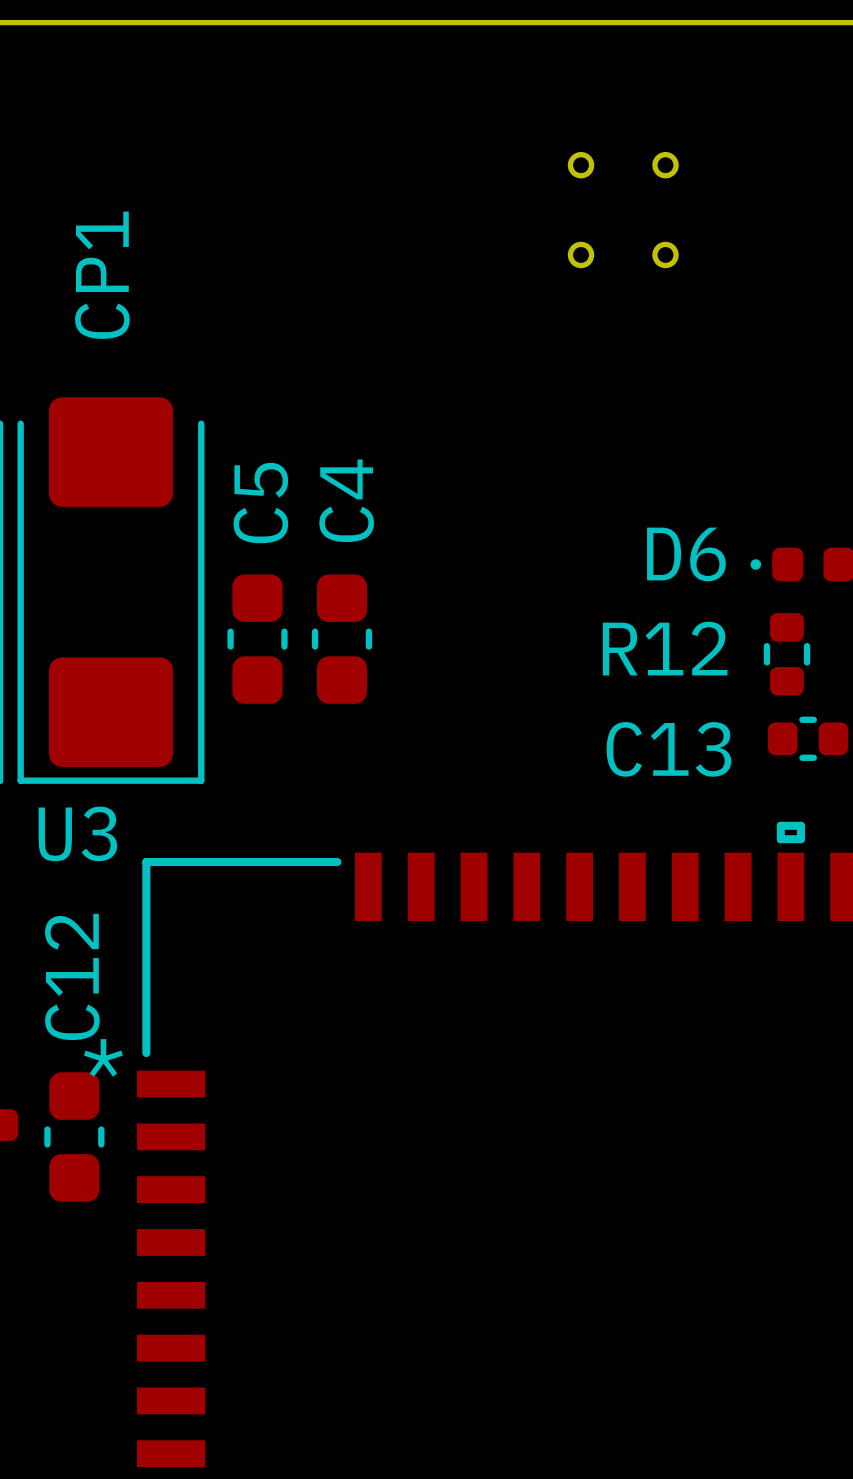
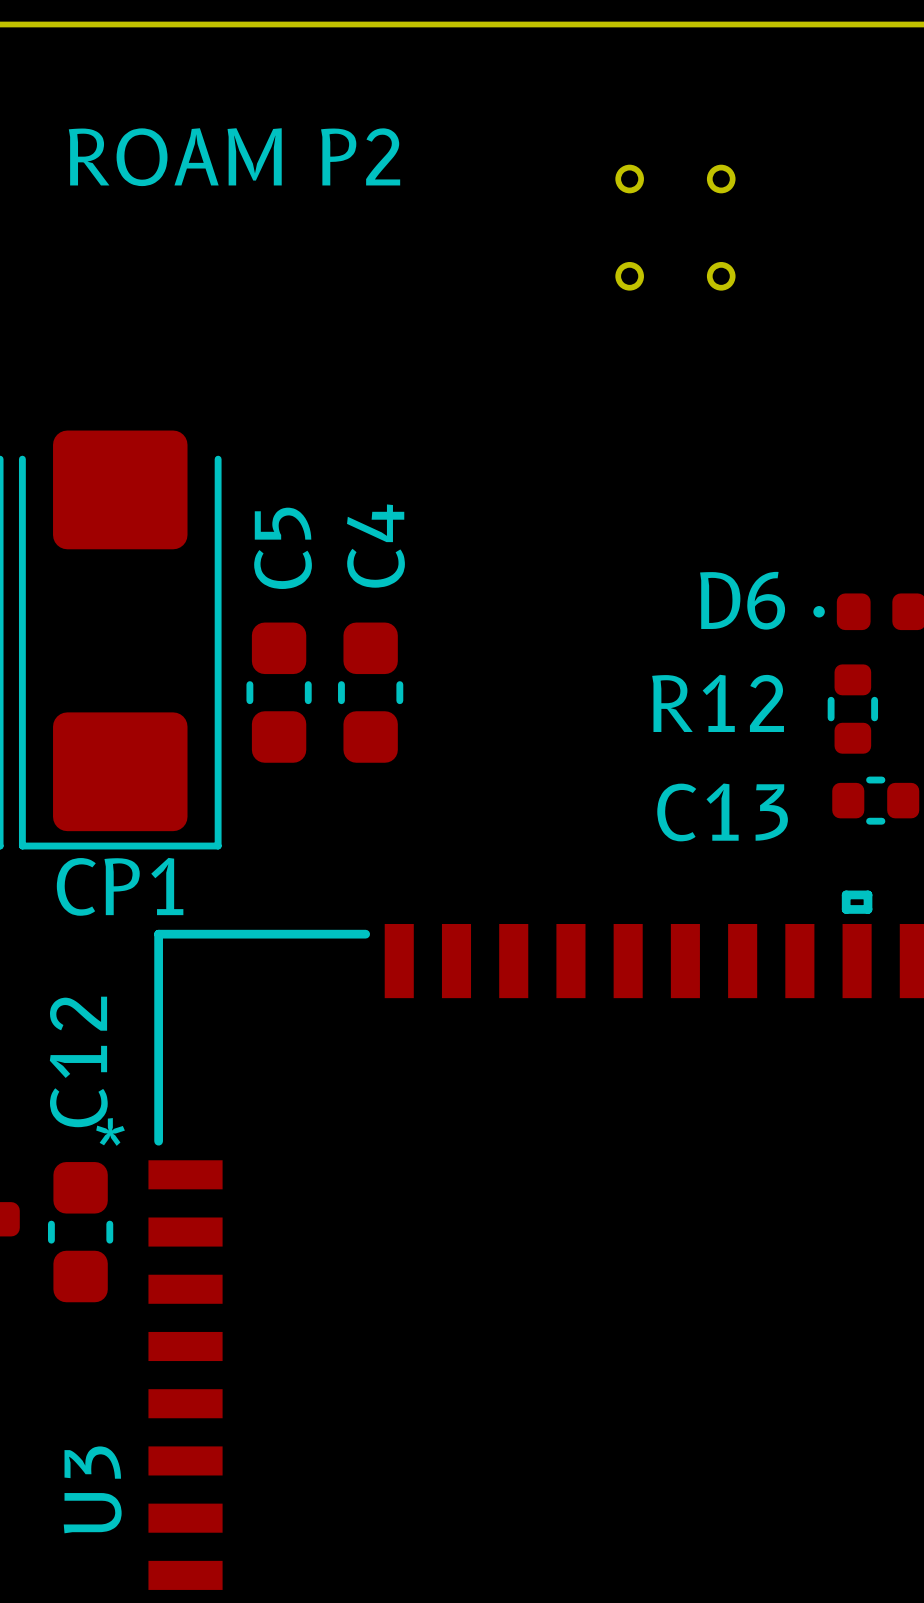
text: none -> ROAM P2 (234, 157)
CP1 name rotation: 0° (102, 275) -> 90° clockwise (120, 886)
CP1 name position: CP1 (102, 275) -> CP1 (120, 886)
U3 name rotation: 0° (77, 833) -> 90° counterclockwise (92, 1489)
U3 name position: U3 (77, 833) -> U3 (92, 1489)

